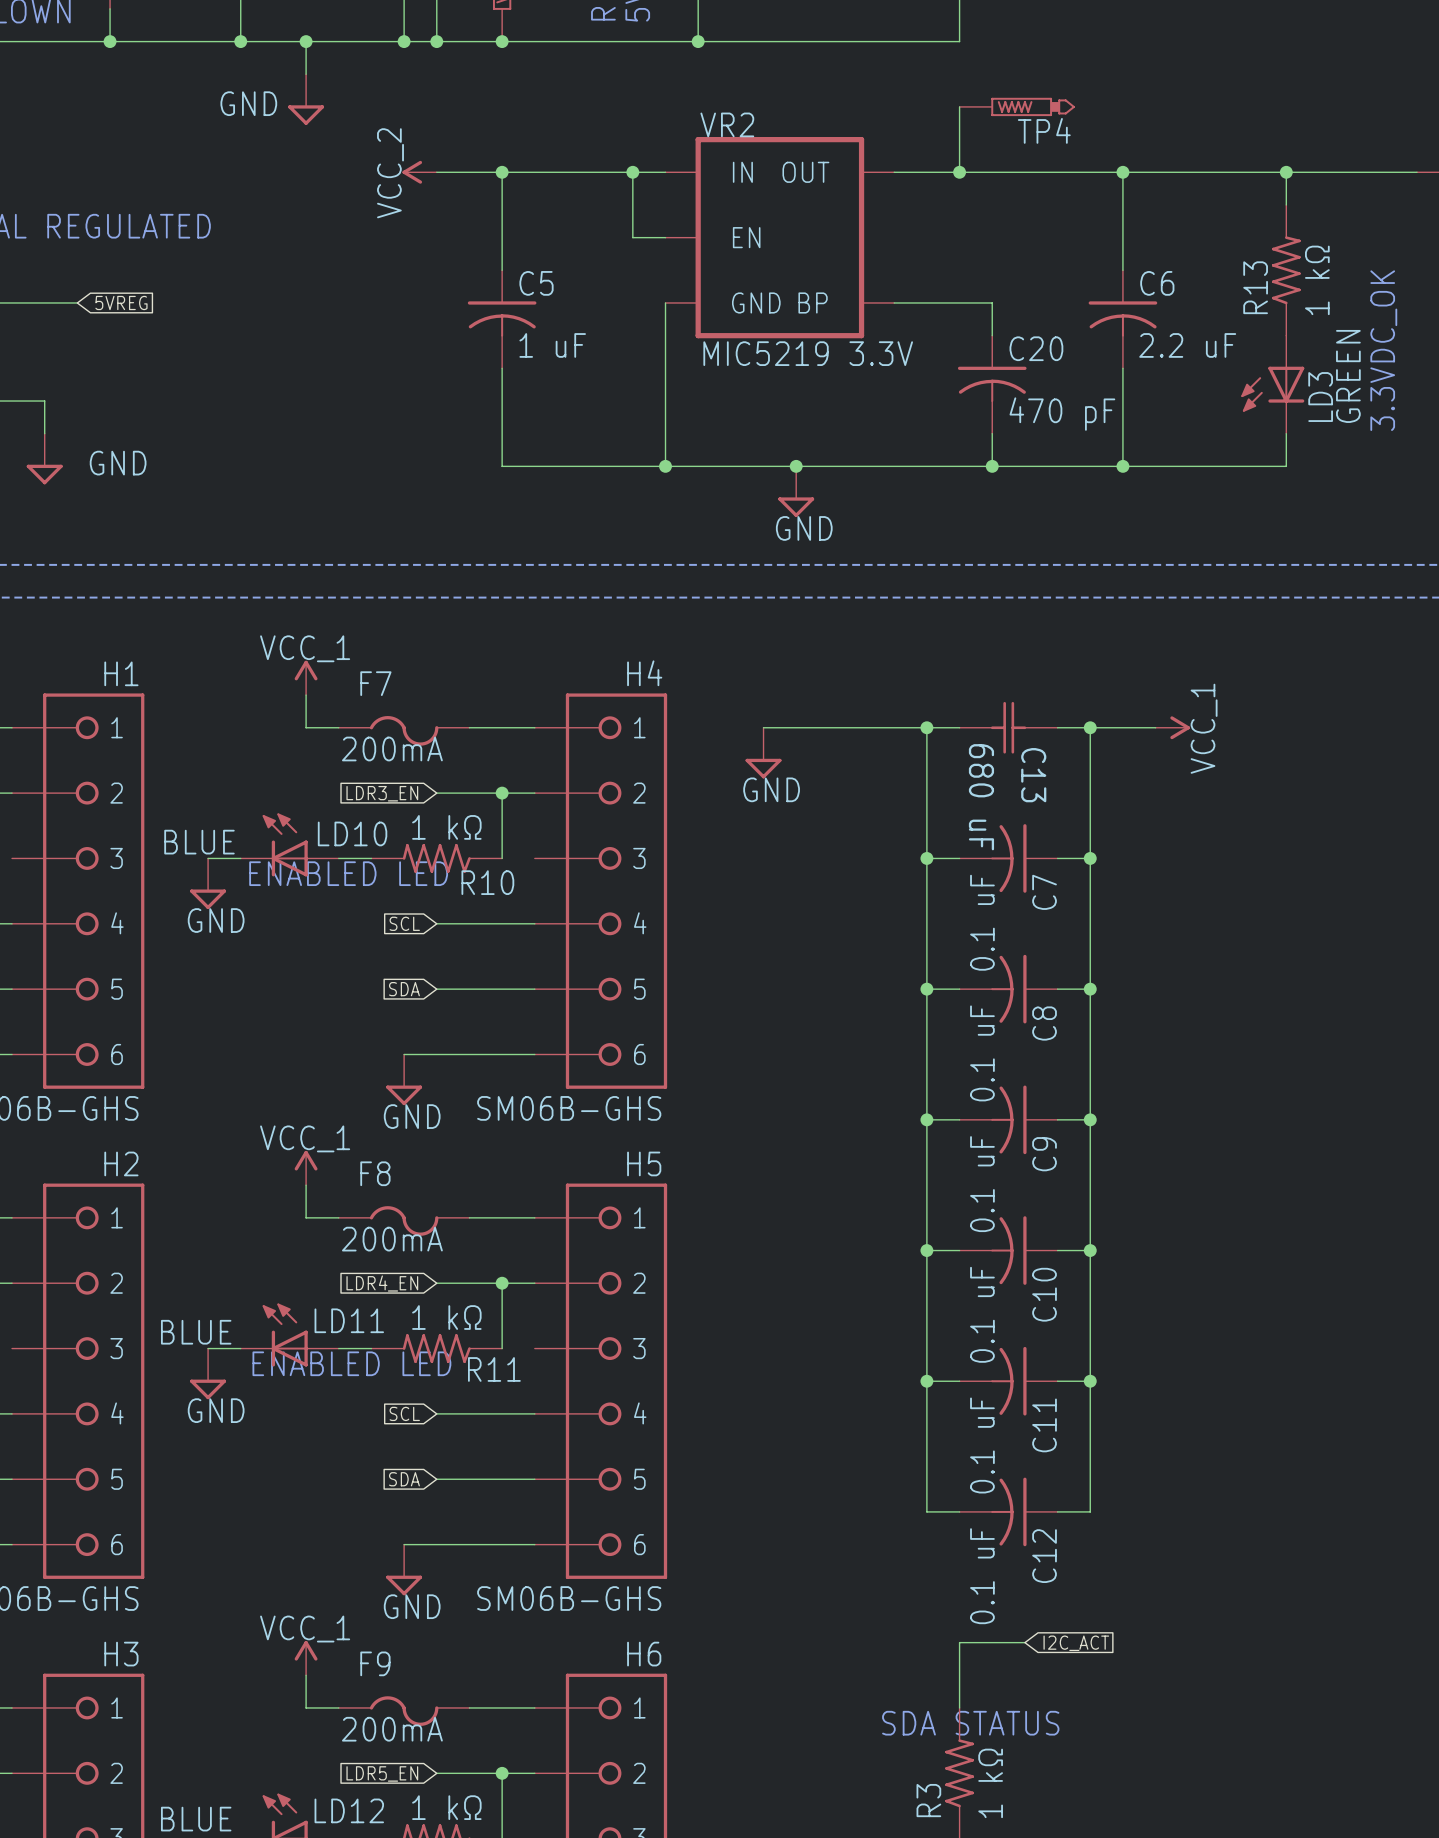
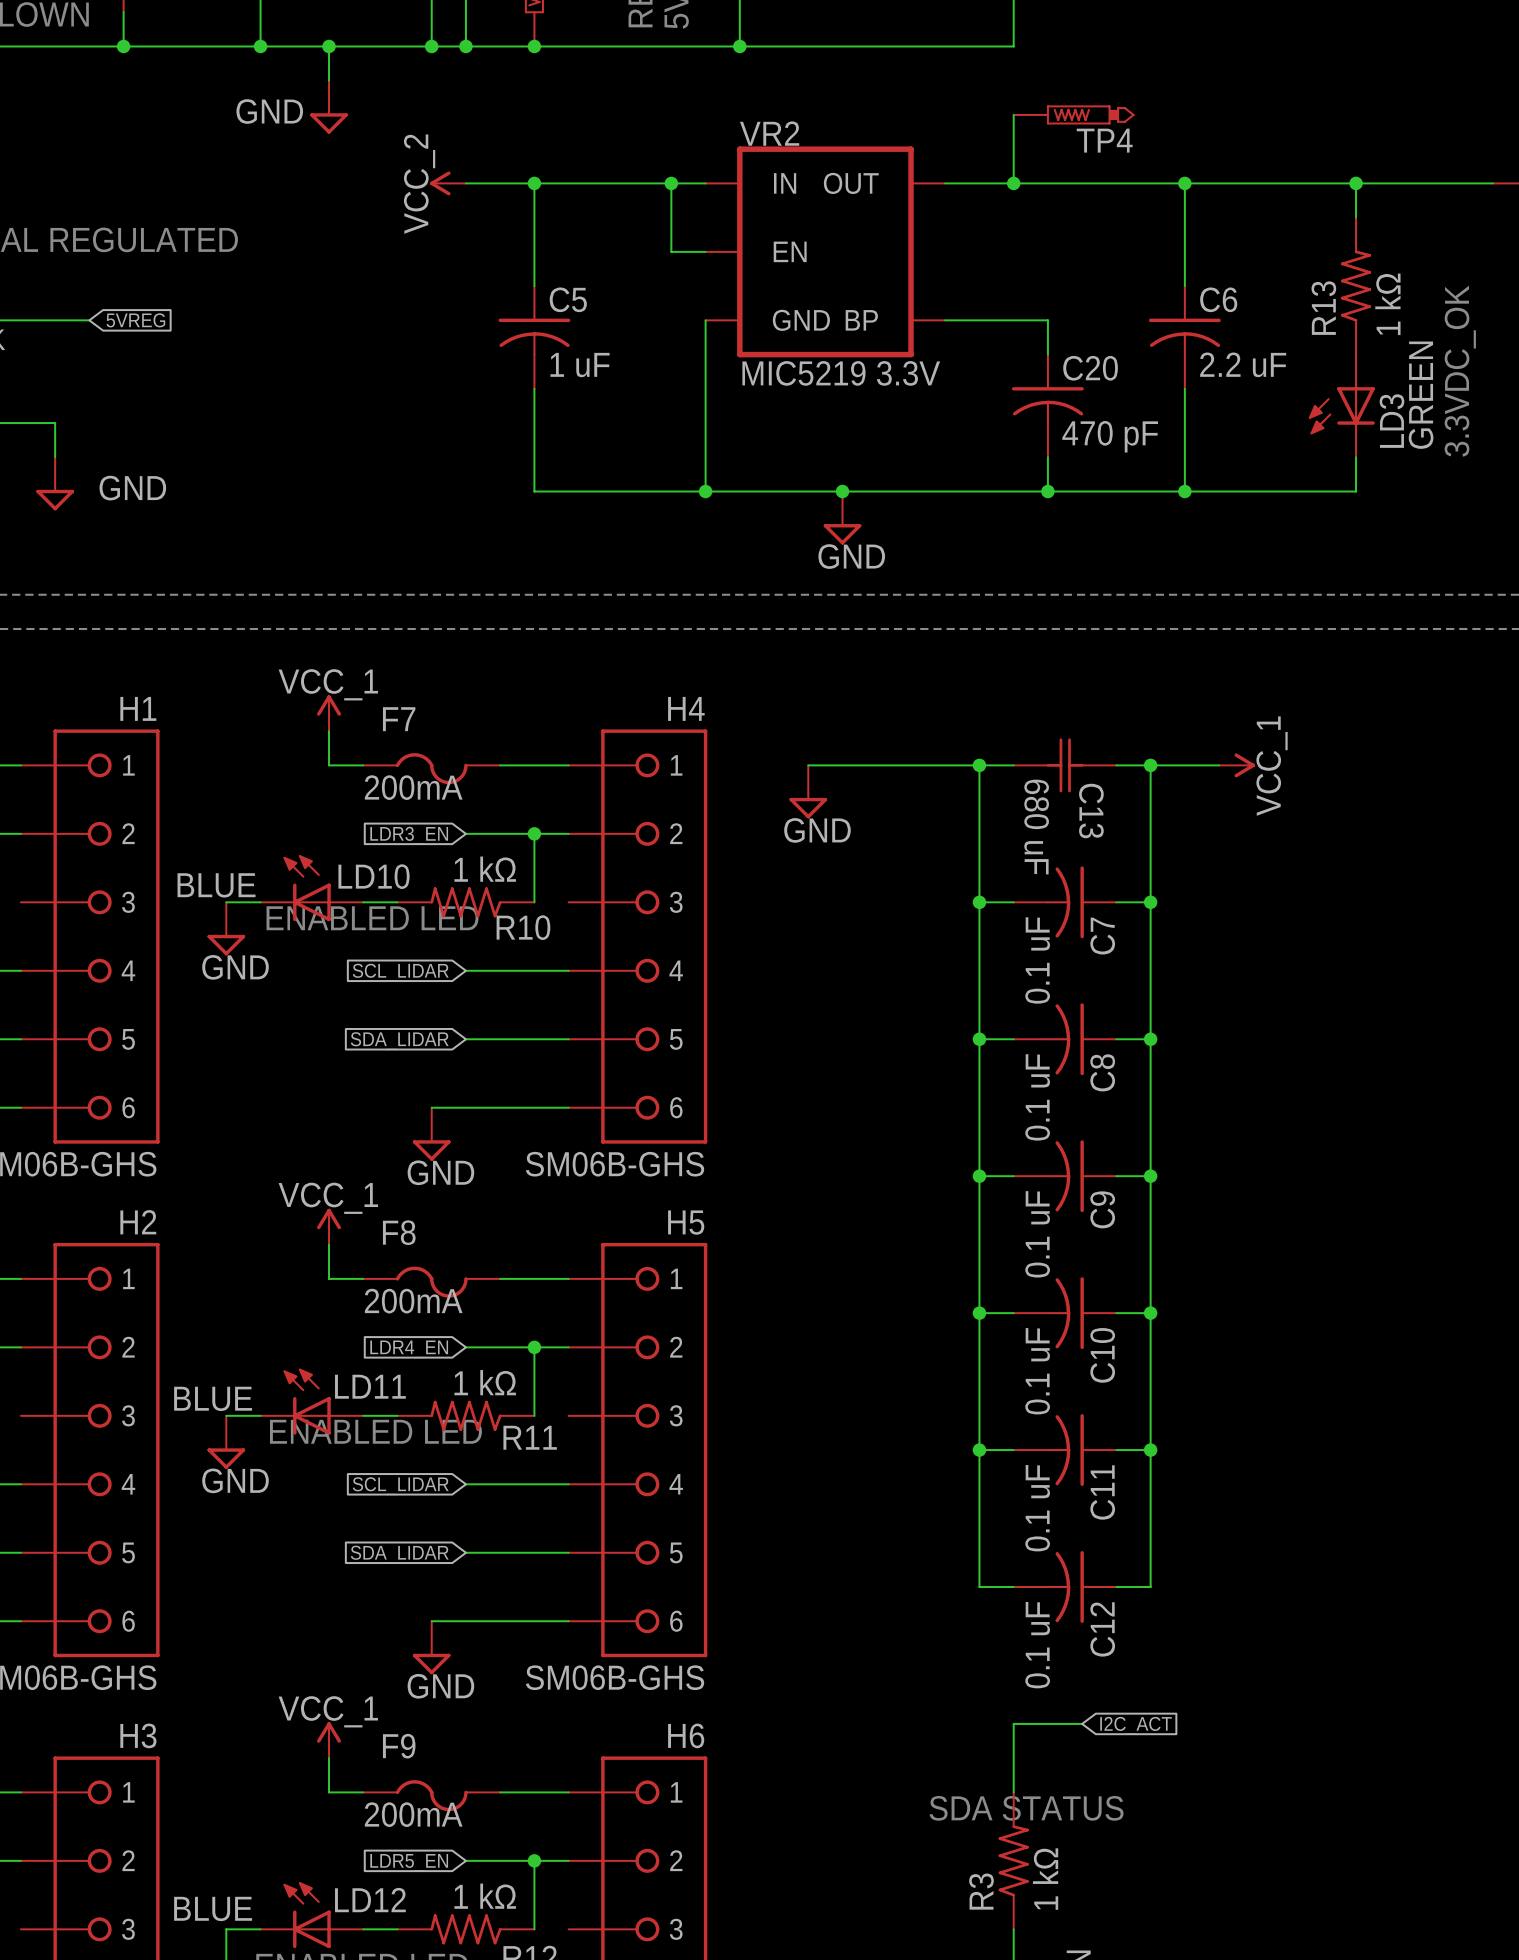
global label: SCL (404, 923) -> SCL_LIDAR (400, 972)
global label: SDA (404, 989) -> SDA_LIDAR (399, 1041)
global label: SCL (404, 1413) -> SCL_LIDAR (400, 1486)
global label: SDA (404, 1479) -> SDA_LIDAR (399, 1554)

